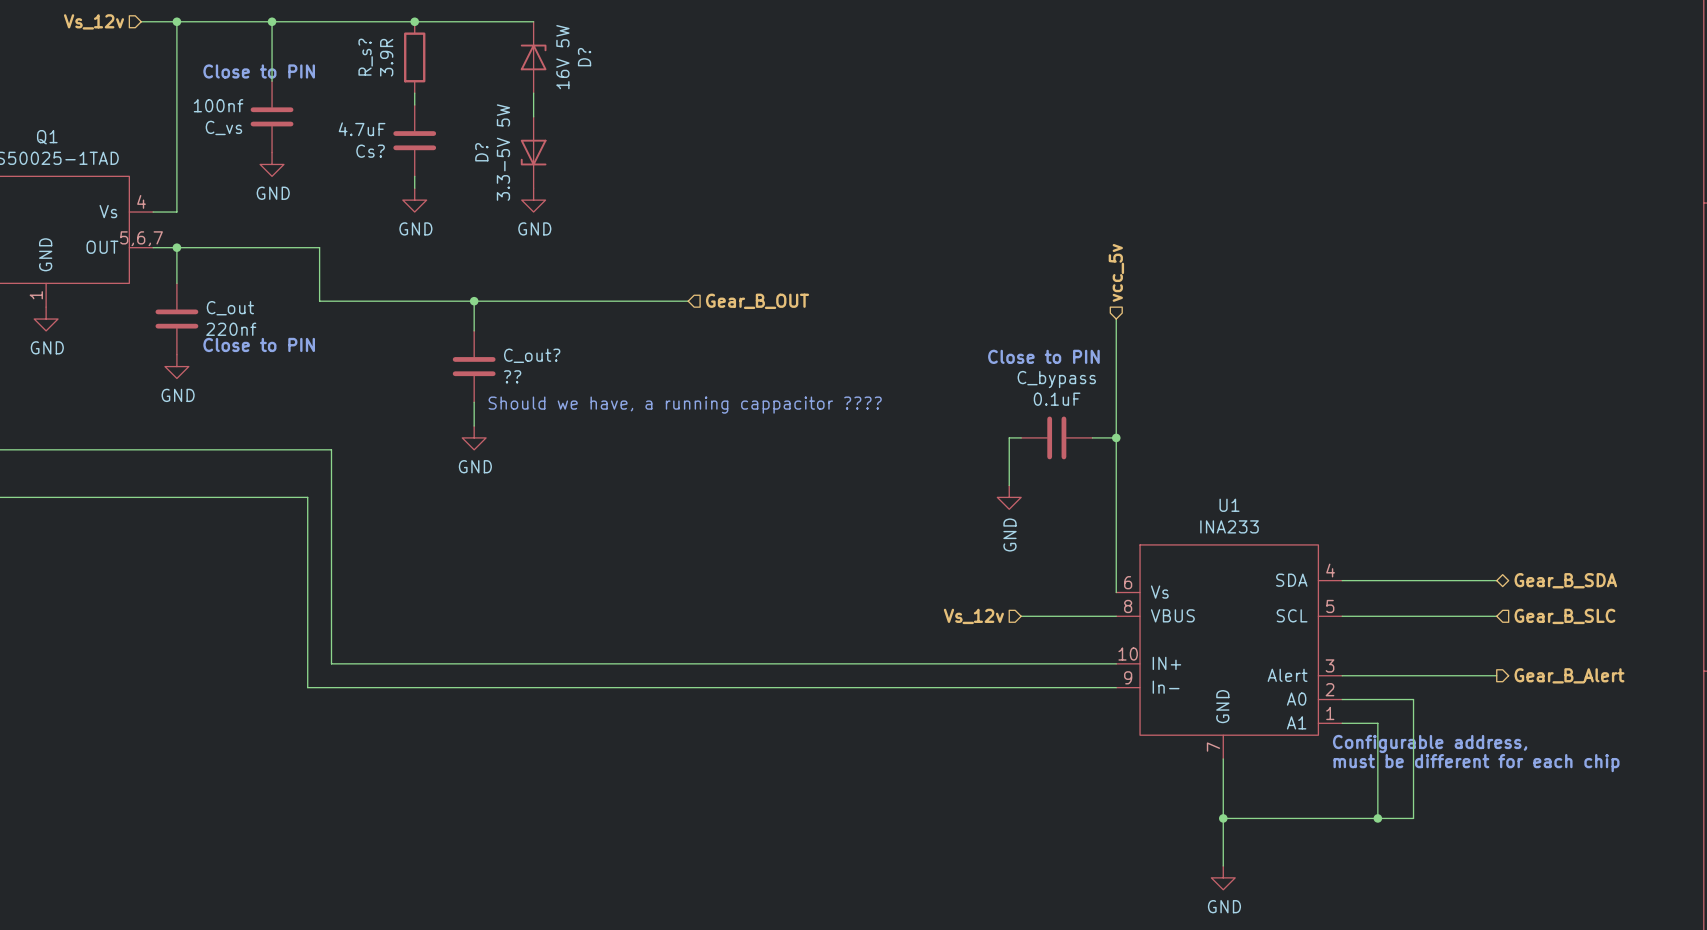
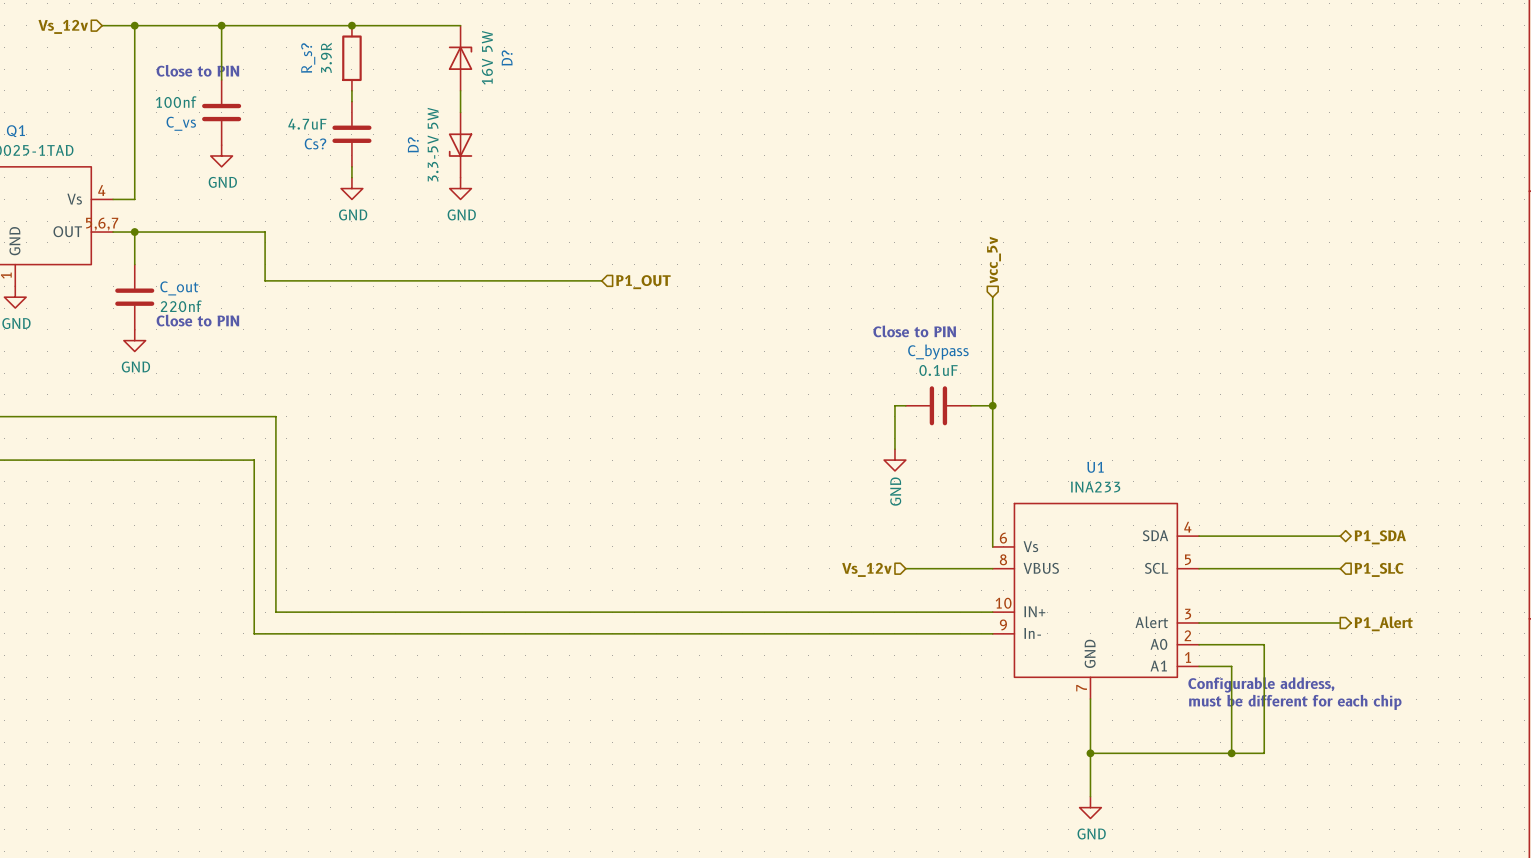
wire: (474, 301) (474, 330) -> none
junction: (474, 301) -> none
hierarchical label: Gear_B_OUT (757, 301) -> P1_OUT (643, 282)
C_out?: ?? (474, 366) -> none
wire: (474, 402) (474, 426) -> none
text: Should we have, a running cappacitor ???? (685, 405) -> none
power symbol: GND (474, 437) -> none
hierarchical label: Gear_B_SDA (1565, 580) -> P1_SDA (1380, 537)
hierarchical label: Gear_B_SLC (1564, 616) -> P1_SLC (1379, 569)
hierarchical label: Gear_B_Alert (1569, 675) -> P1_Alert (1383, 623)

